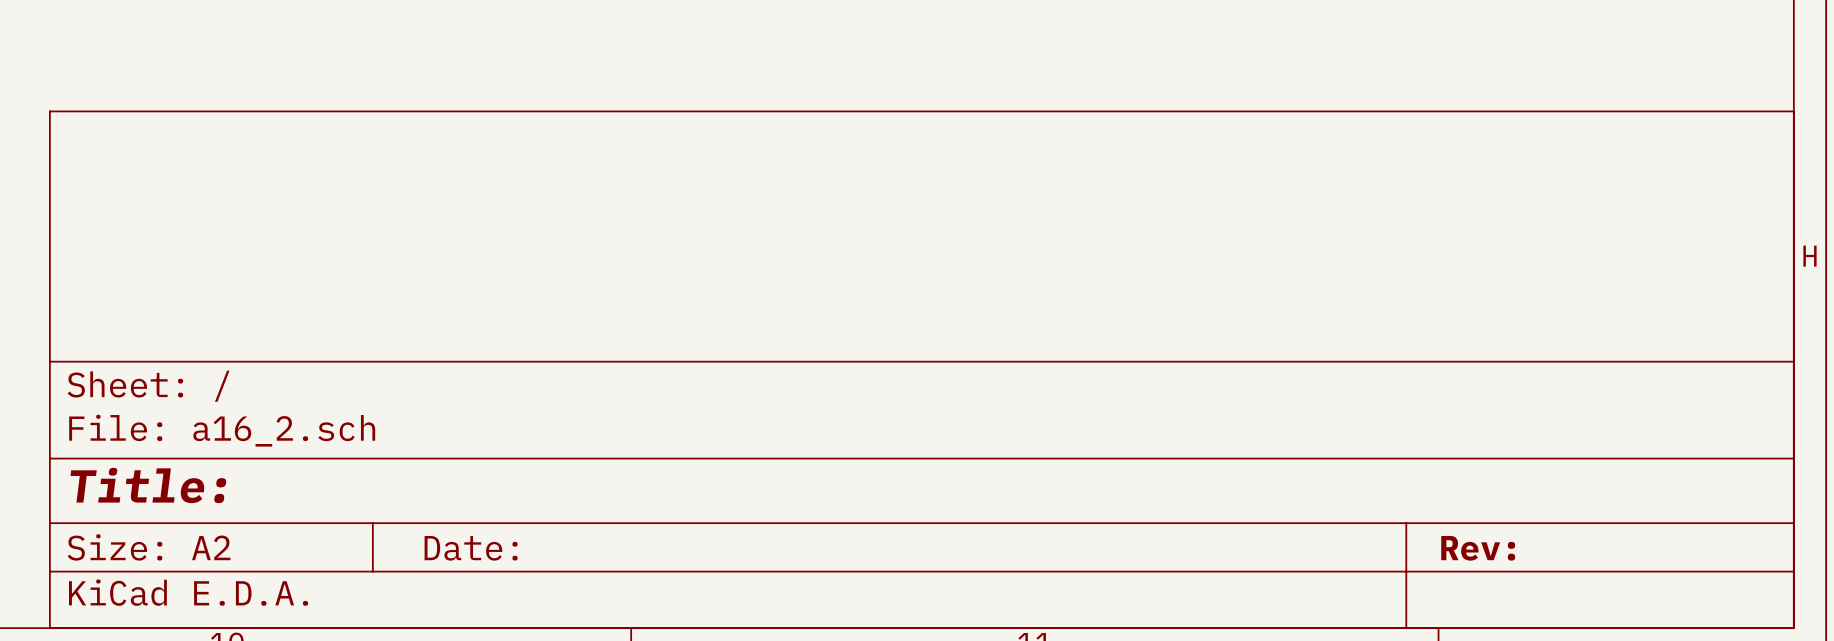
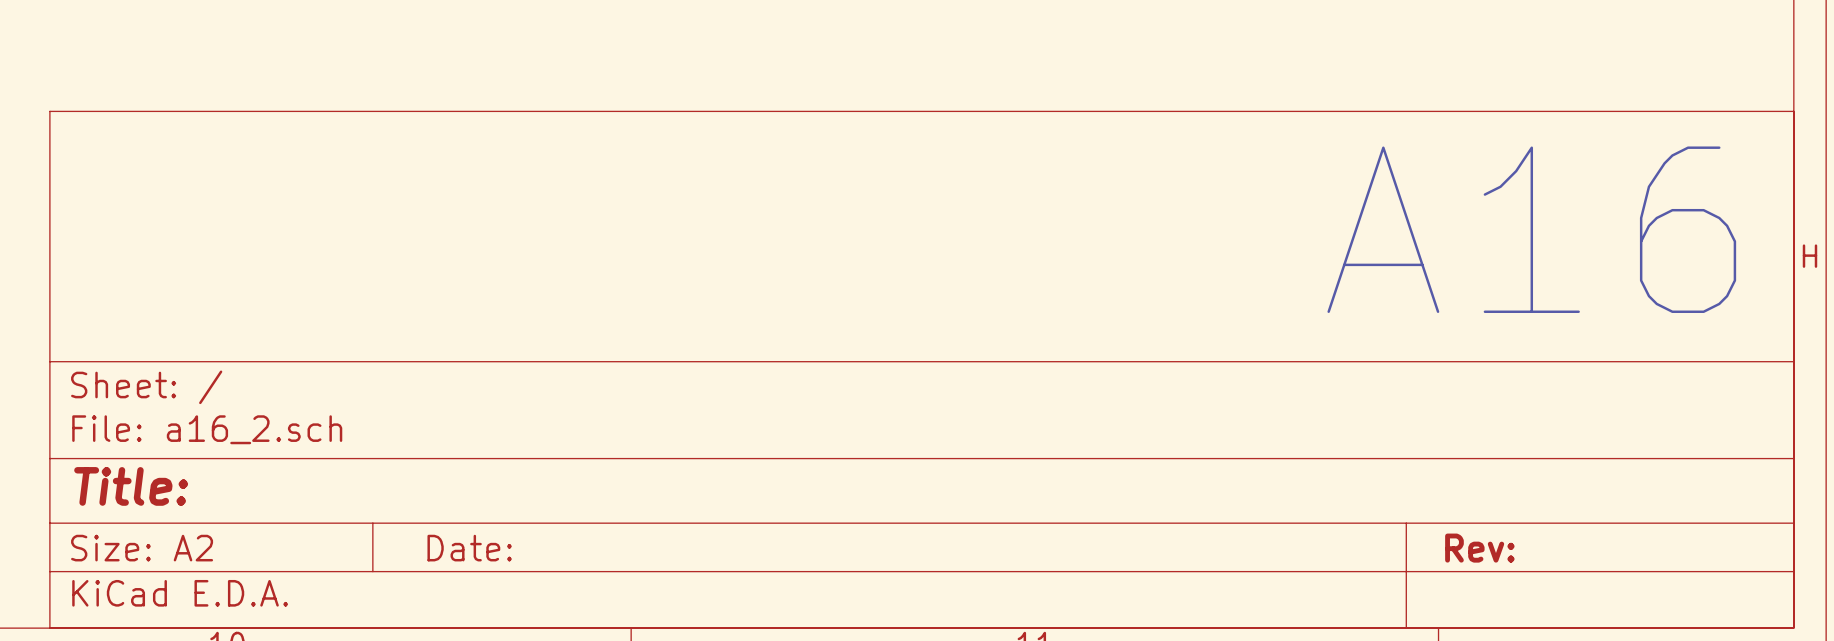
text: none -> A16 (1531, 229)

